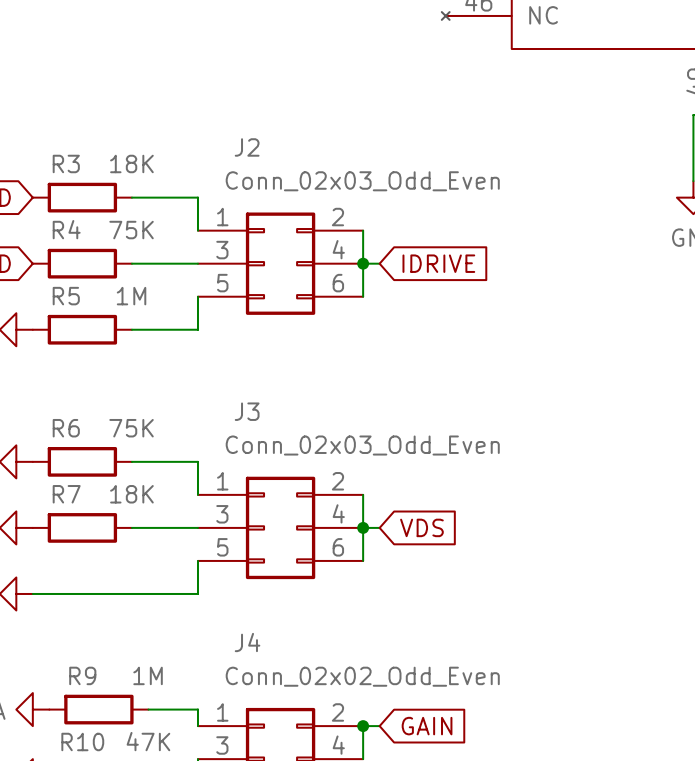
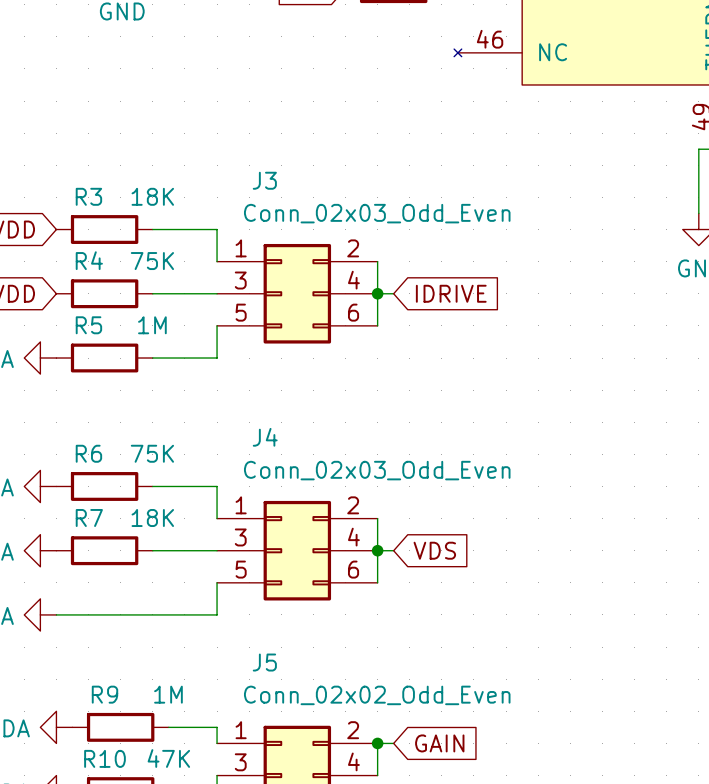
J2 name: J2 (247, 147) -> J3 (264, 180)
J3 name: J3 (247, 411) -> J4 (265, 437)
J4 name: J4 (247, 642) -> J5 (264, 662)

